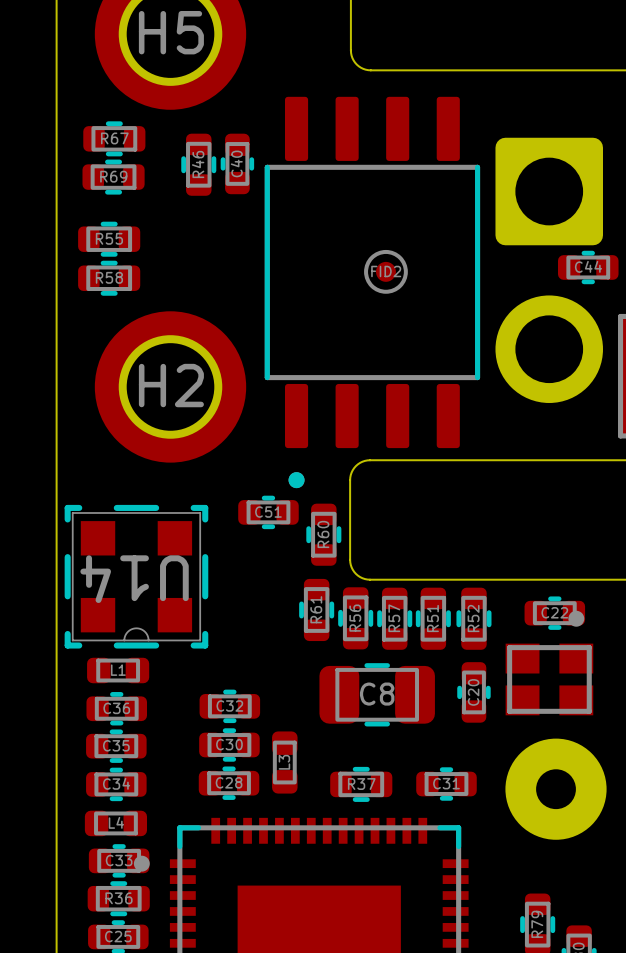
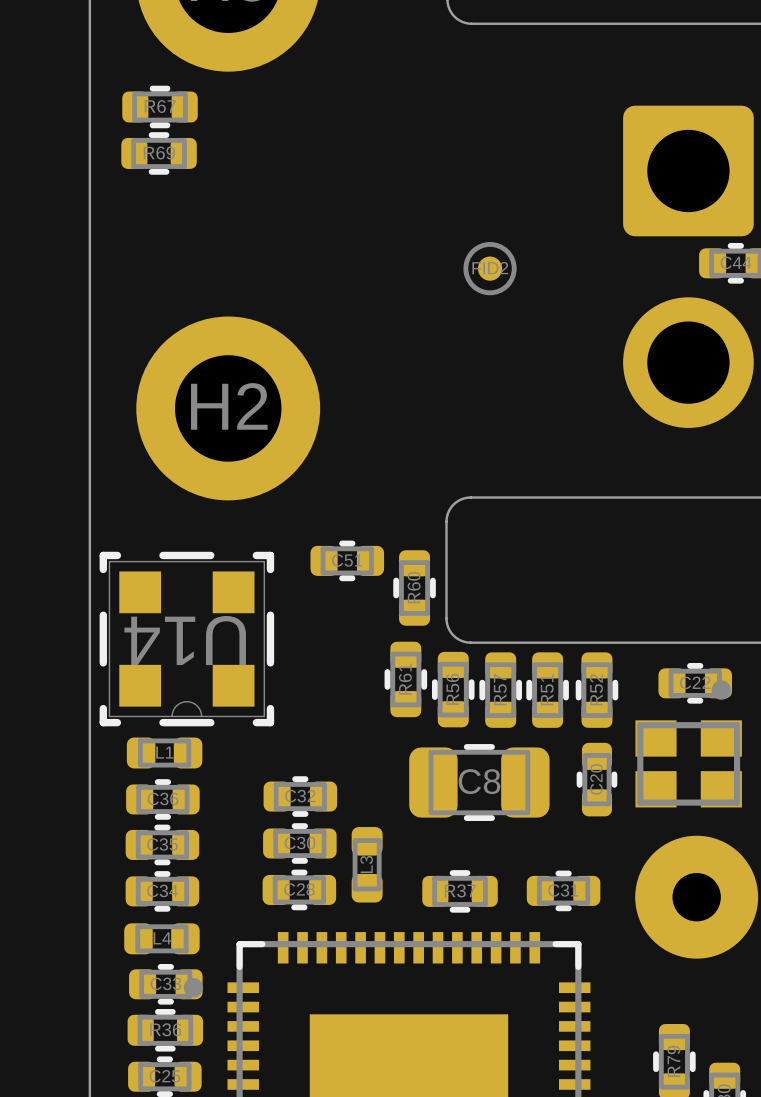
C40: (237, 163) -> none
R46: (198, 164) -> none
R55: (109, 239) -> none
R58: (109, 278) -> none
part: (372, 292) -> none

